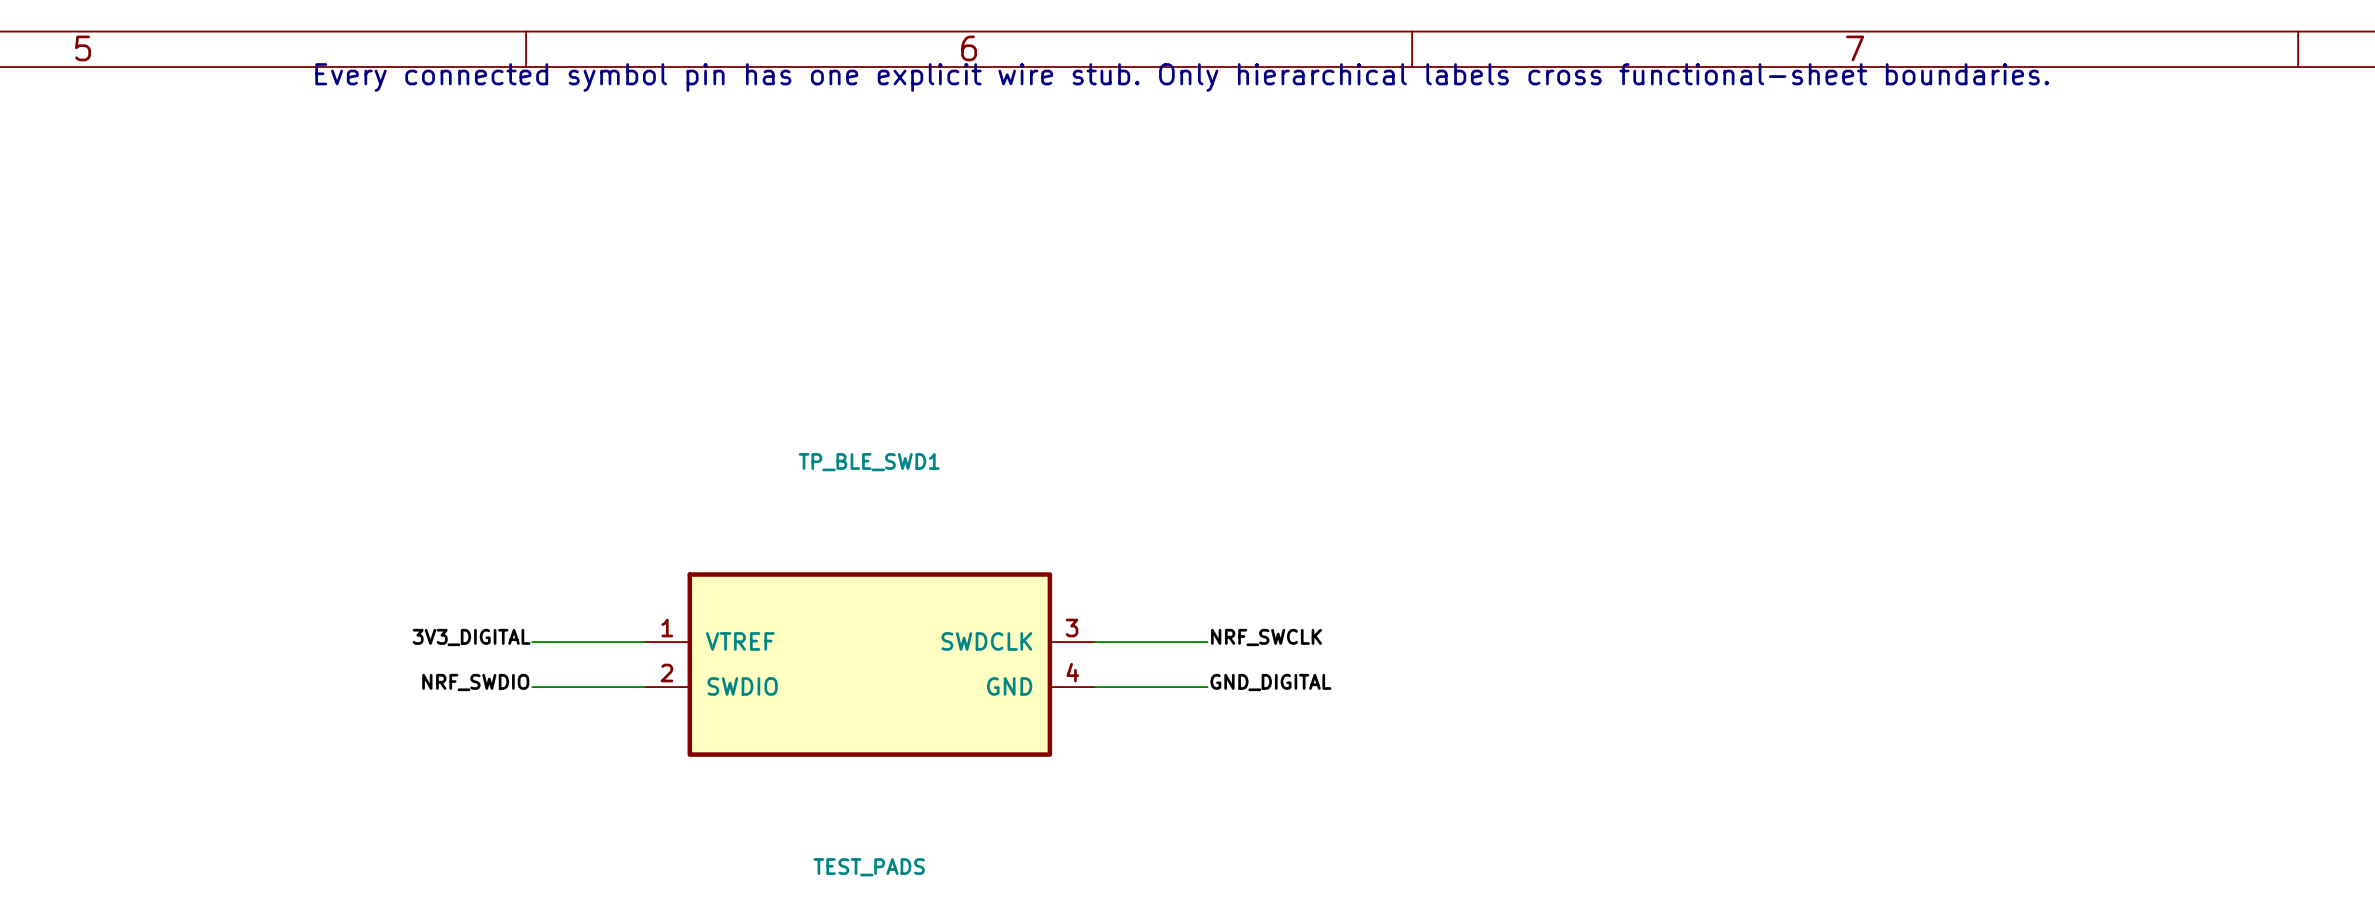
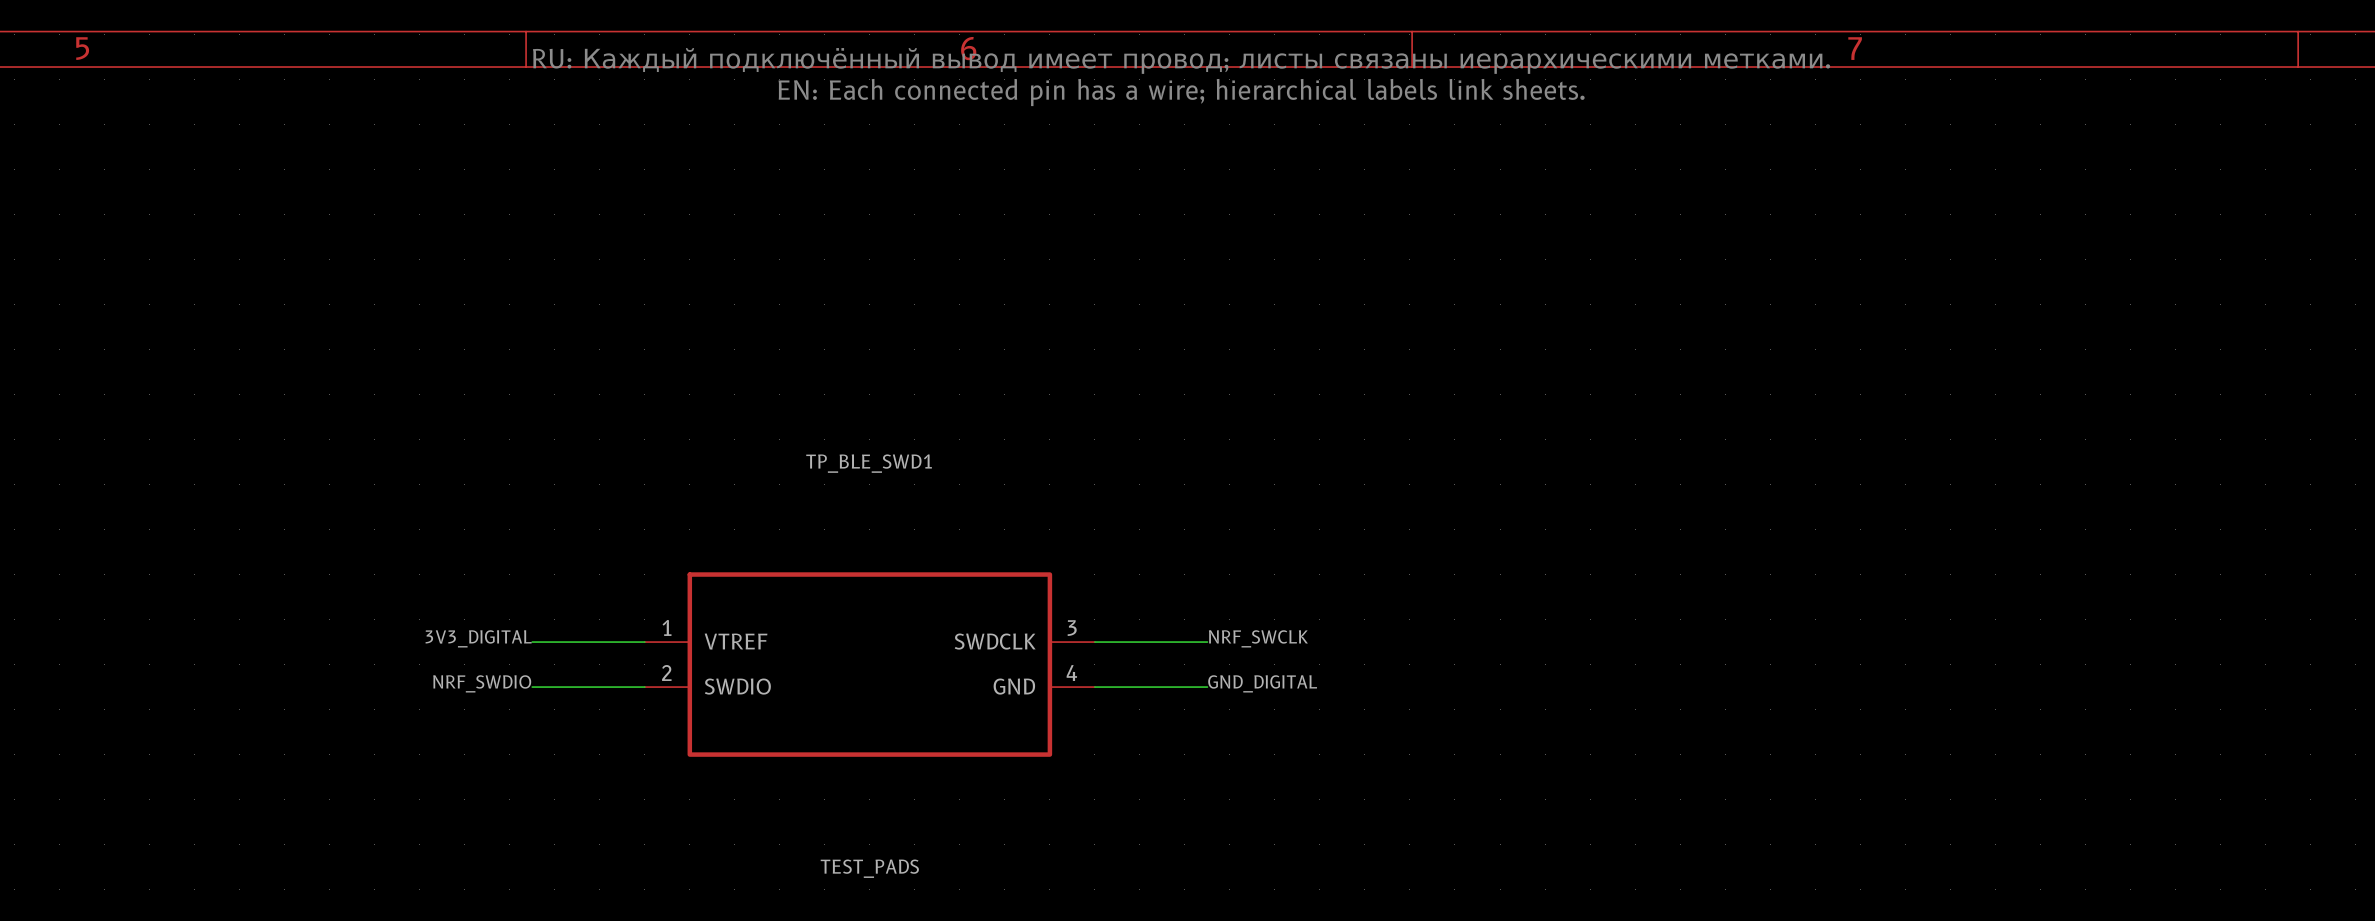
text: none -> RU: Каждый подключённый вывод имеет провод; листы связаны иерархическими метками. (1181, 60)
text: Every connected symbol pin has one explicit wire stub. Only hierarchical labels cross functional-sheet boundaries. (1182, 77) -> none
text: none -> EN: Each connected pin has a wire; hierarchical labels link sheets. (1181, 92)

